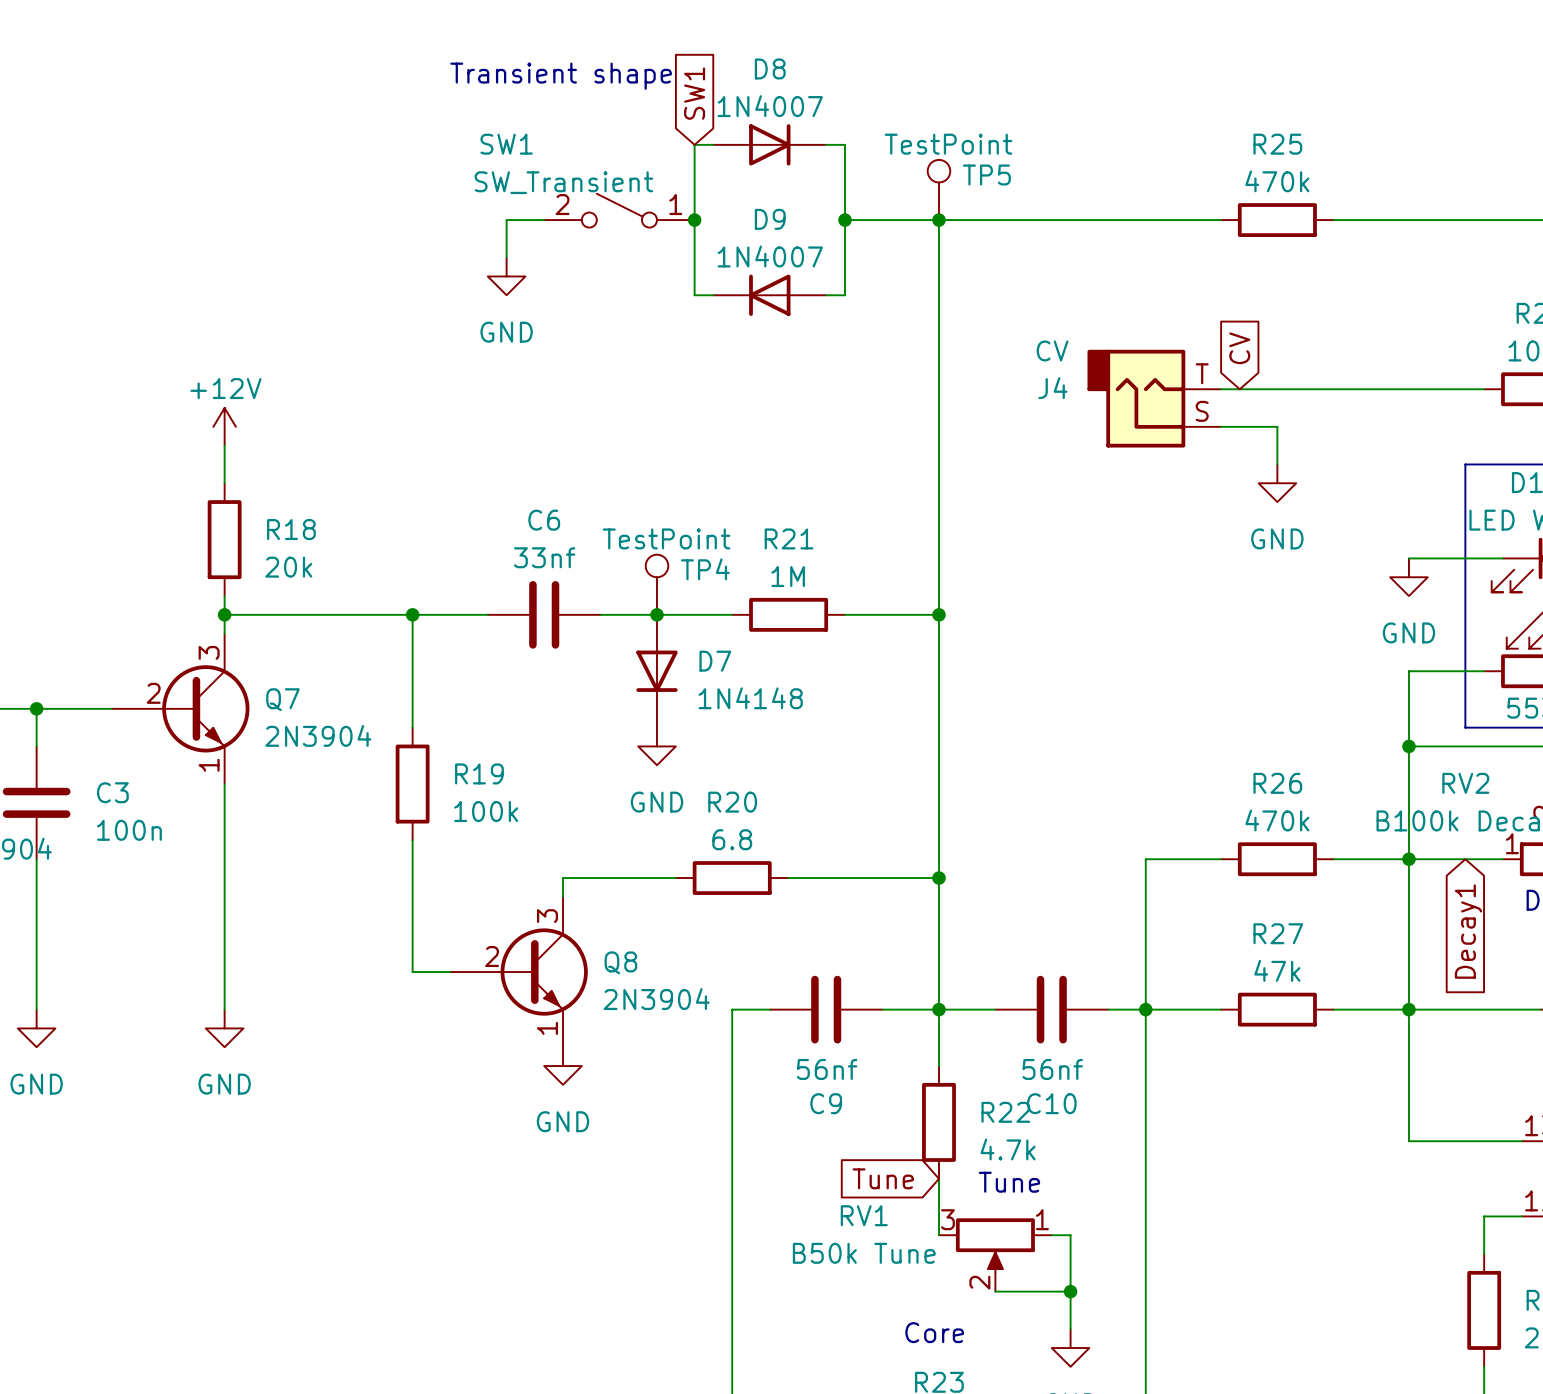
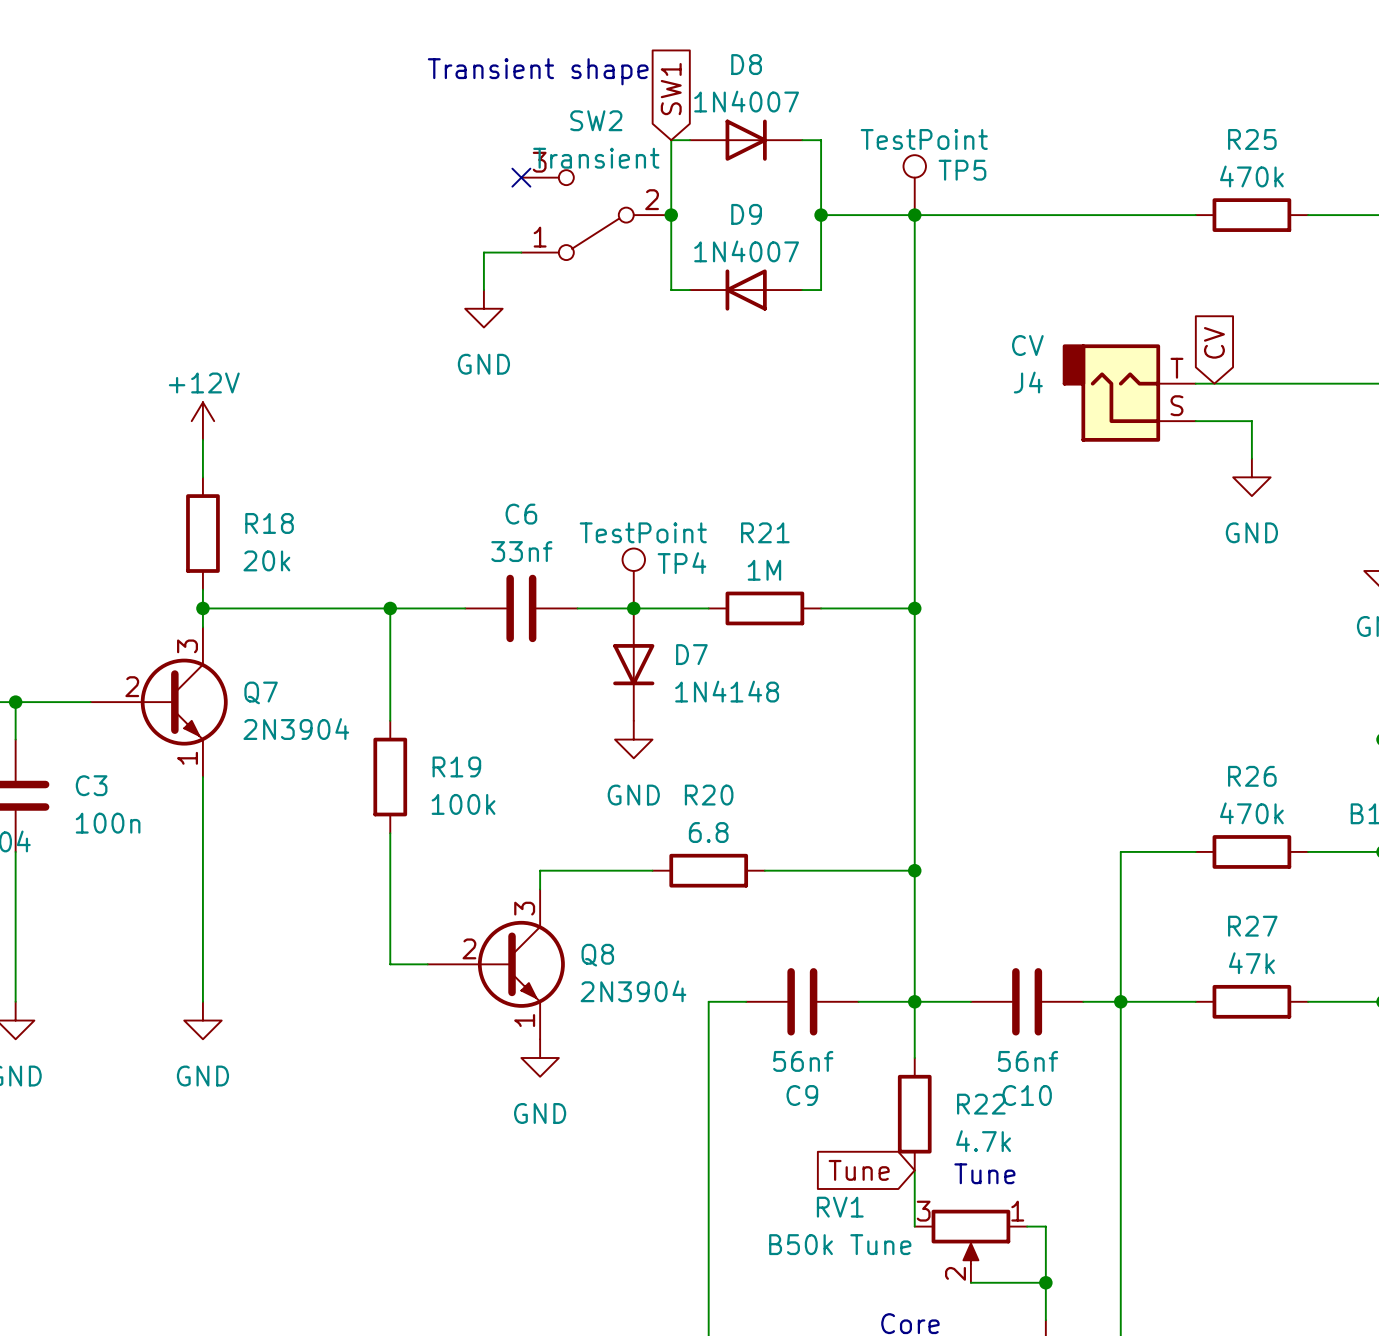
no-connect mark: none -> (521, 177)
SW1: SW_Transient (619, 210) -> none
wire: (544, 220) (506, 220) (506, 257) -> (521, 252) (483, 252) (483, 290)
SW2: none -> Transient (596, 215)
power symbol position: GND (506, 276) -> GND (483, 308)

